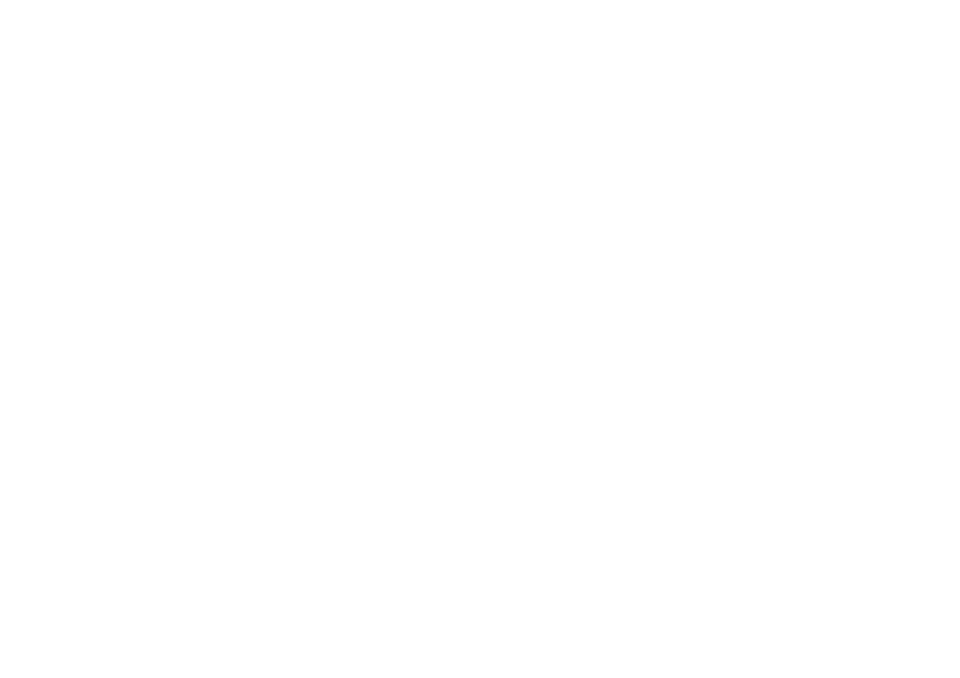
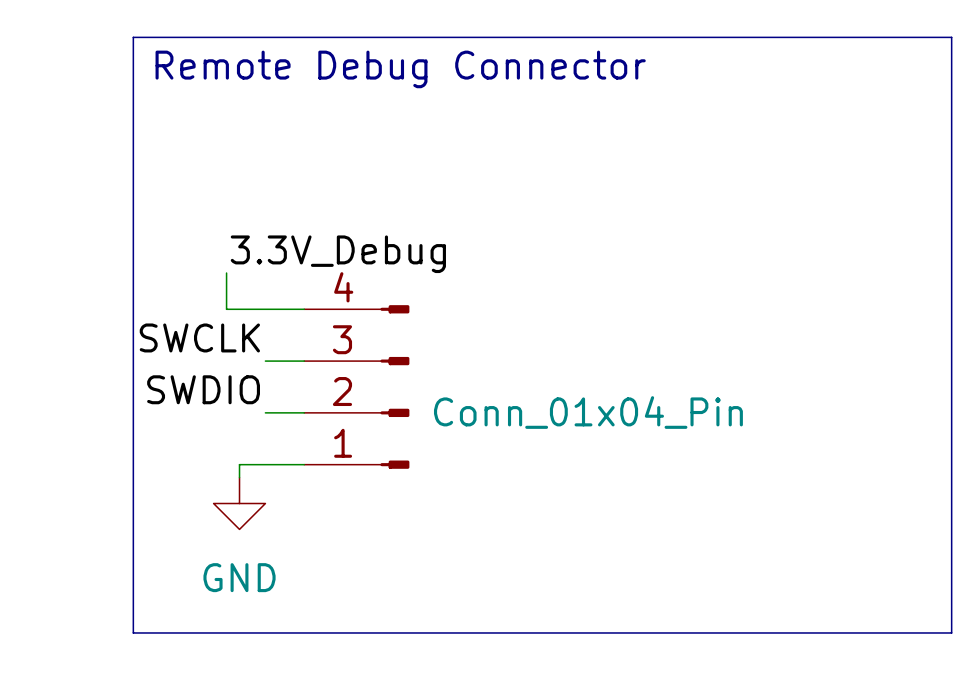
line: none -> (133, 37) (951, 37) (951, 632) (133, 632) (133, 37)
text: none -> Remote Debug Connector (400, 69)
label: none -> 3.3V_Debug (338, 254)
wire: none -> (226, 273) (226, 309) (304, 309)
label: none -> SWCLK (199, 337)
wire: none -> (265, 361) (304, 361)
part: none -> Conn_01x04_Pin (356, 386)
label: none -> SWDIO (203, 389)
wire: none -> (265, 412) (304, 412)
wire: none -> (304, 464) (239, 464) (239, 477)
power symbol: none -> GND (239, 503)

